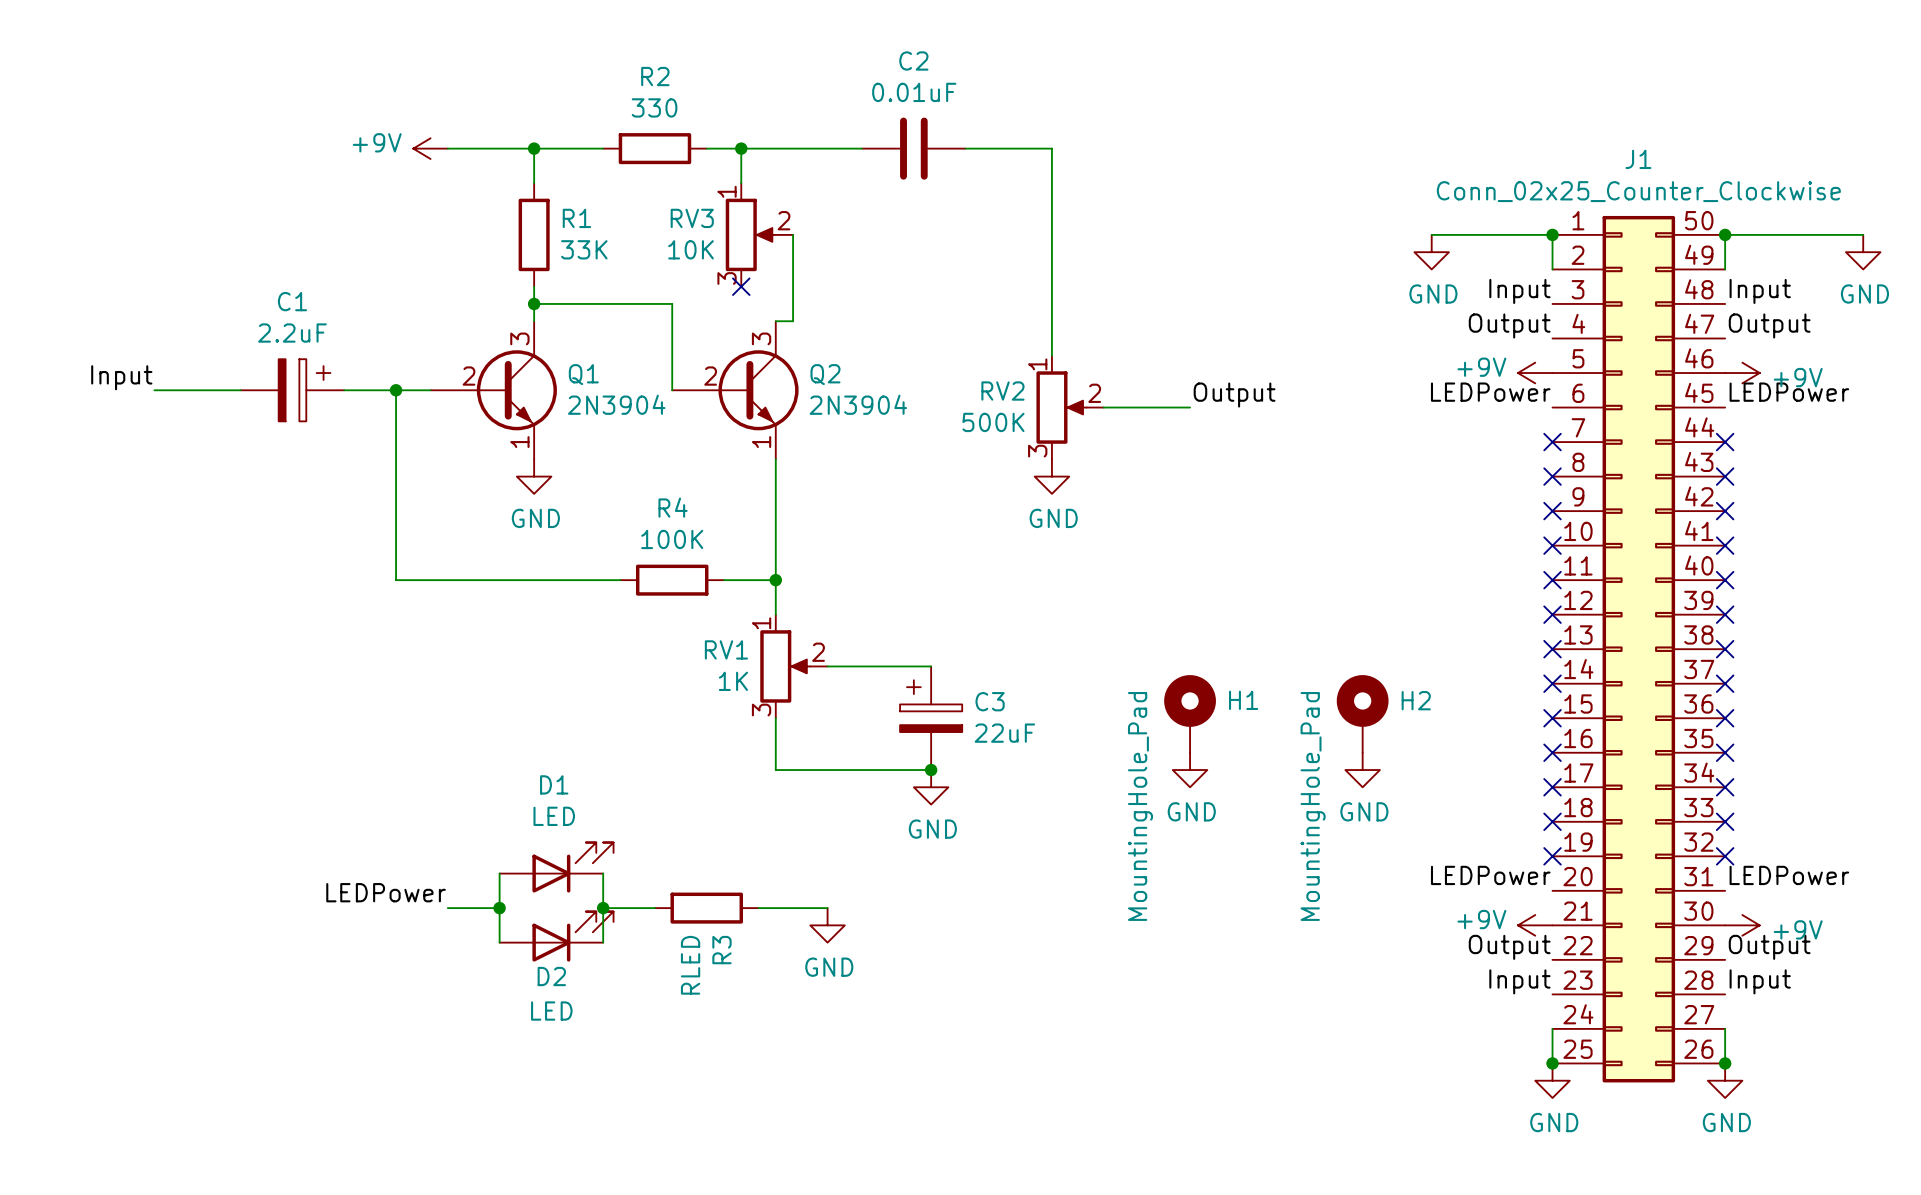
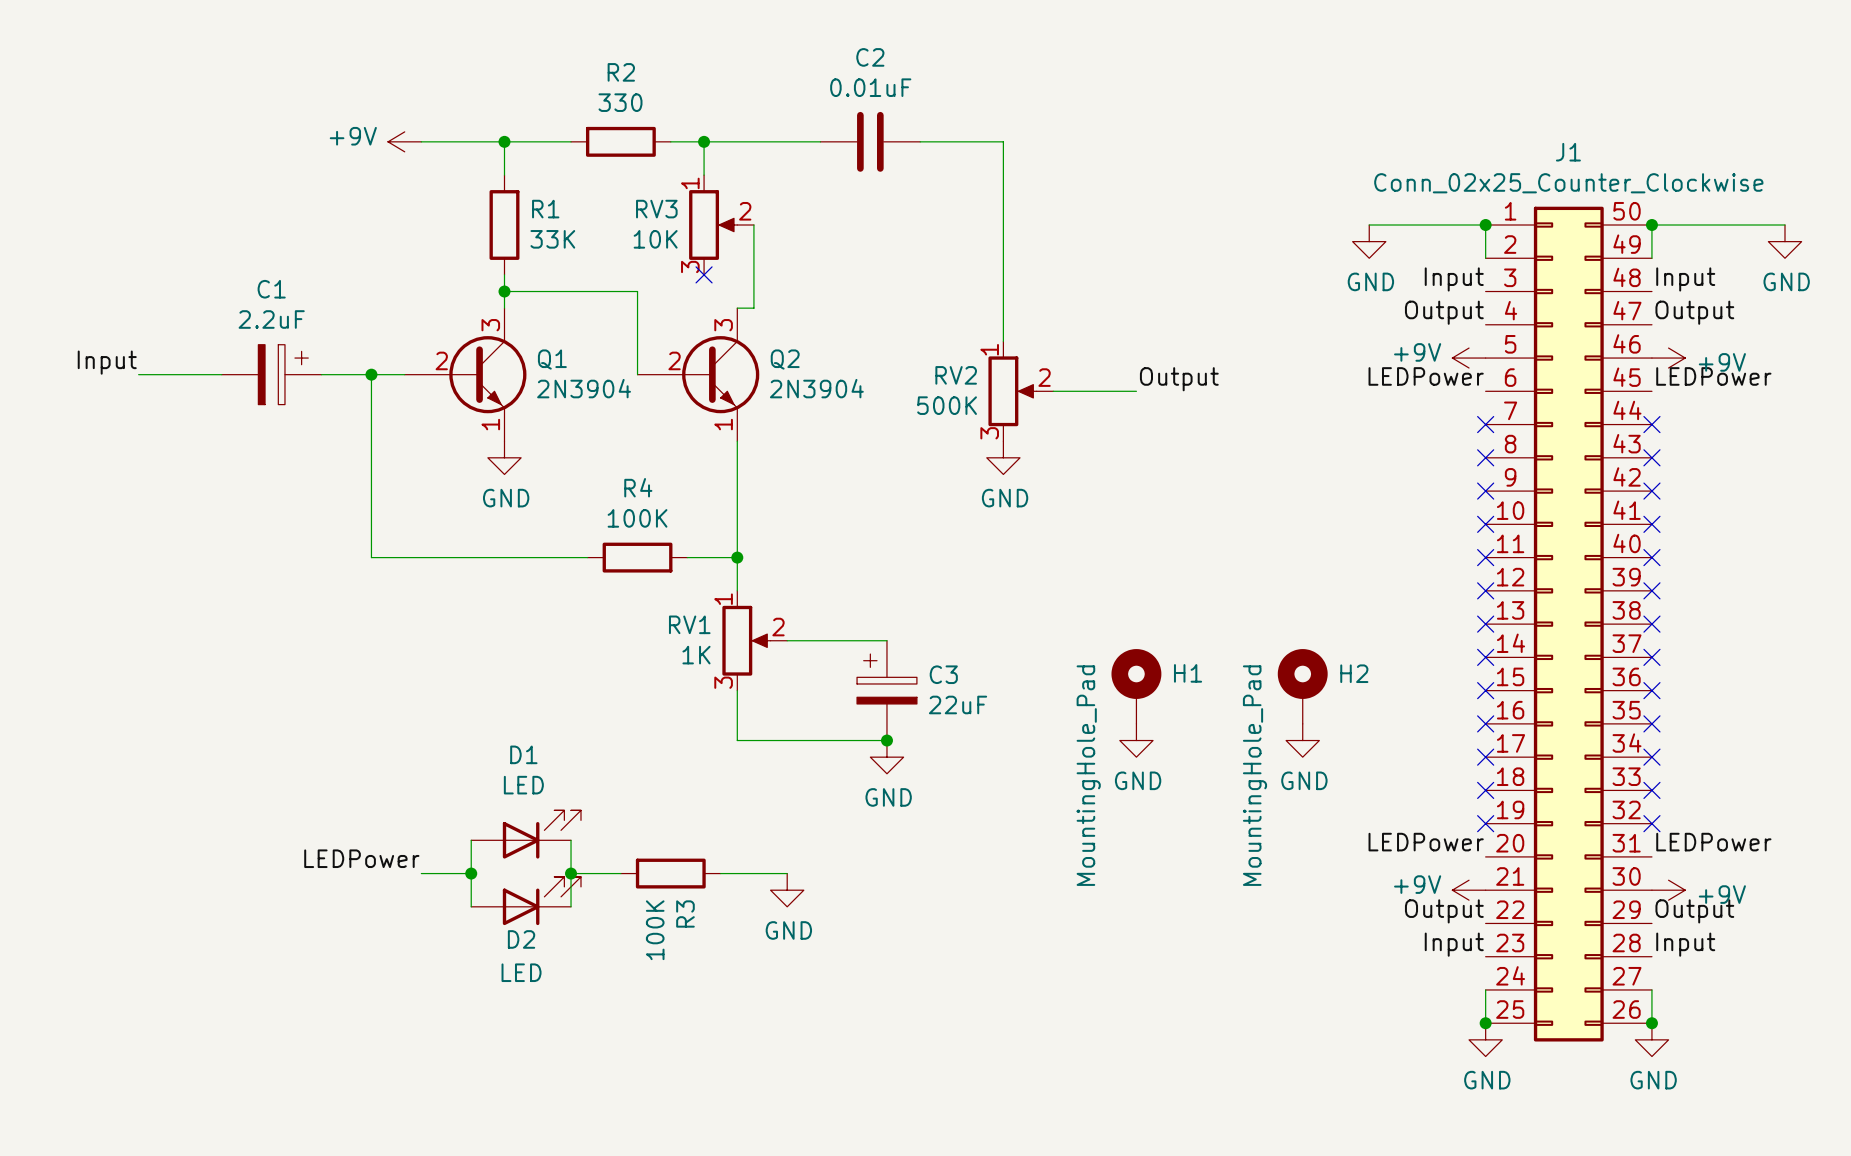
R3 value: RLED (690, 965) -> 100K (655, 930)

